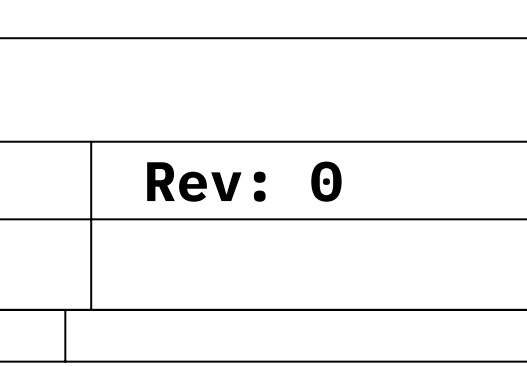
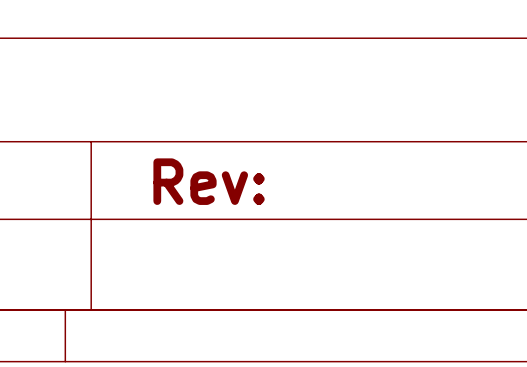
title block: Rev: 0 (244, 181) -> Rev: (209, 181)

